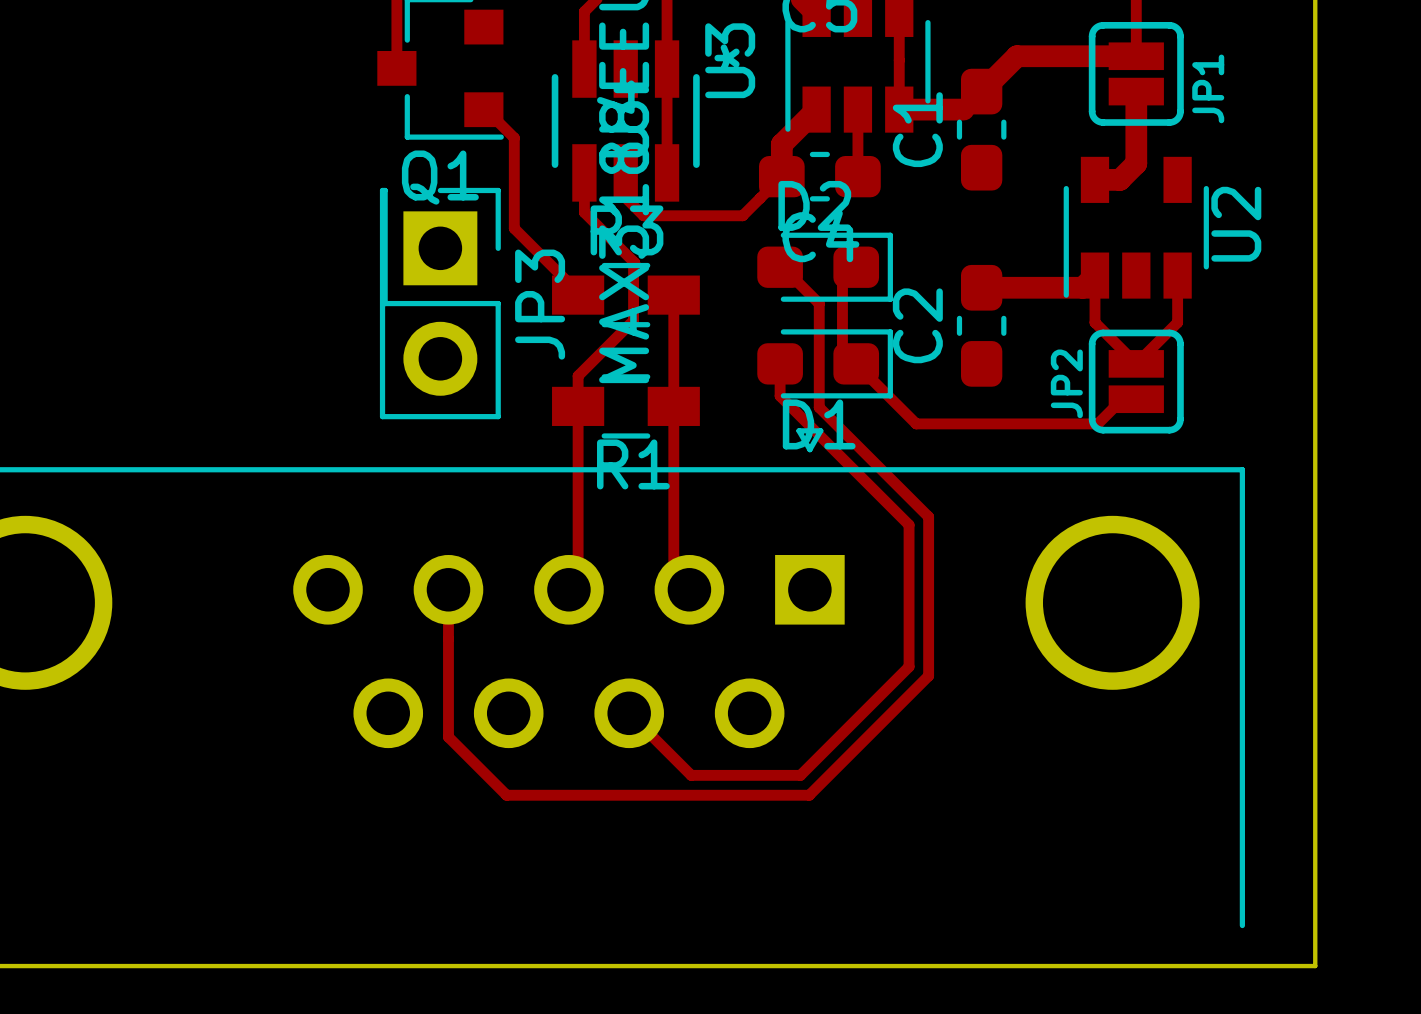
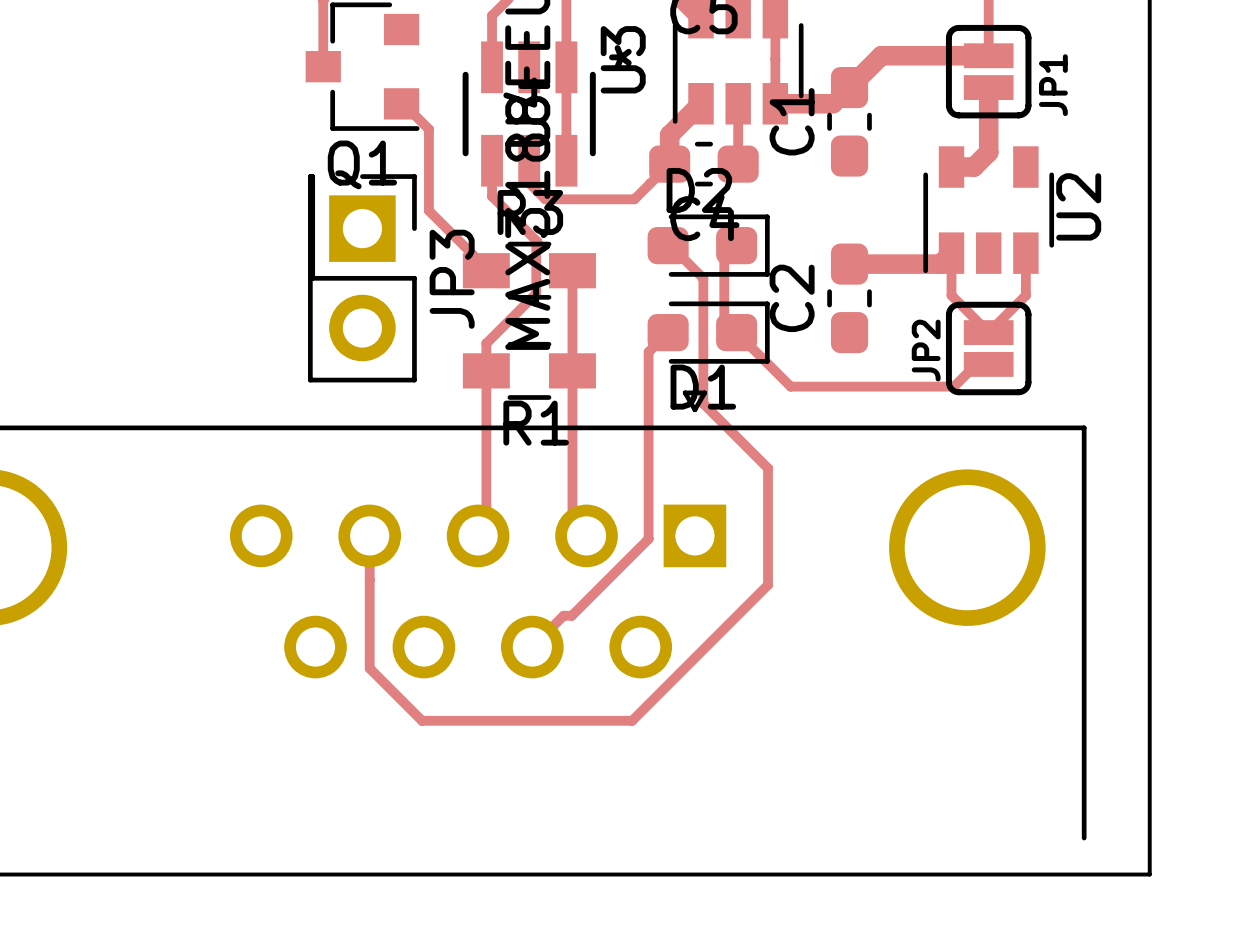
track: (780, 363) (780, 396) (909, 524) (909, 666) (800, 775) (691, 775) (629, 713) -> (668, 332) (648, 352) (648, 538) (571, 615) (563, 615) (532, 647)
track: (819, 407) (928, 516) (928, 675) (809, 795) (740, 795) -> (703, 371) (703, 403) (768, 468) (768, 584) (632, 720)

